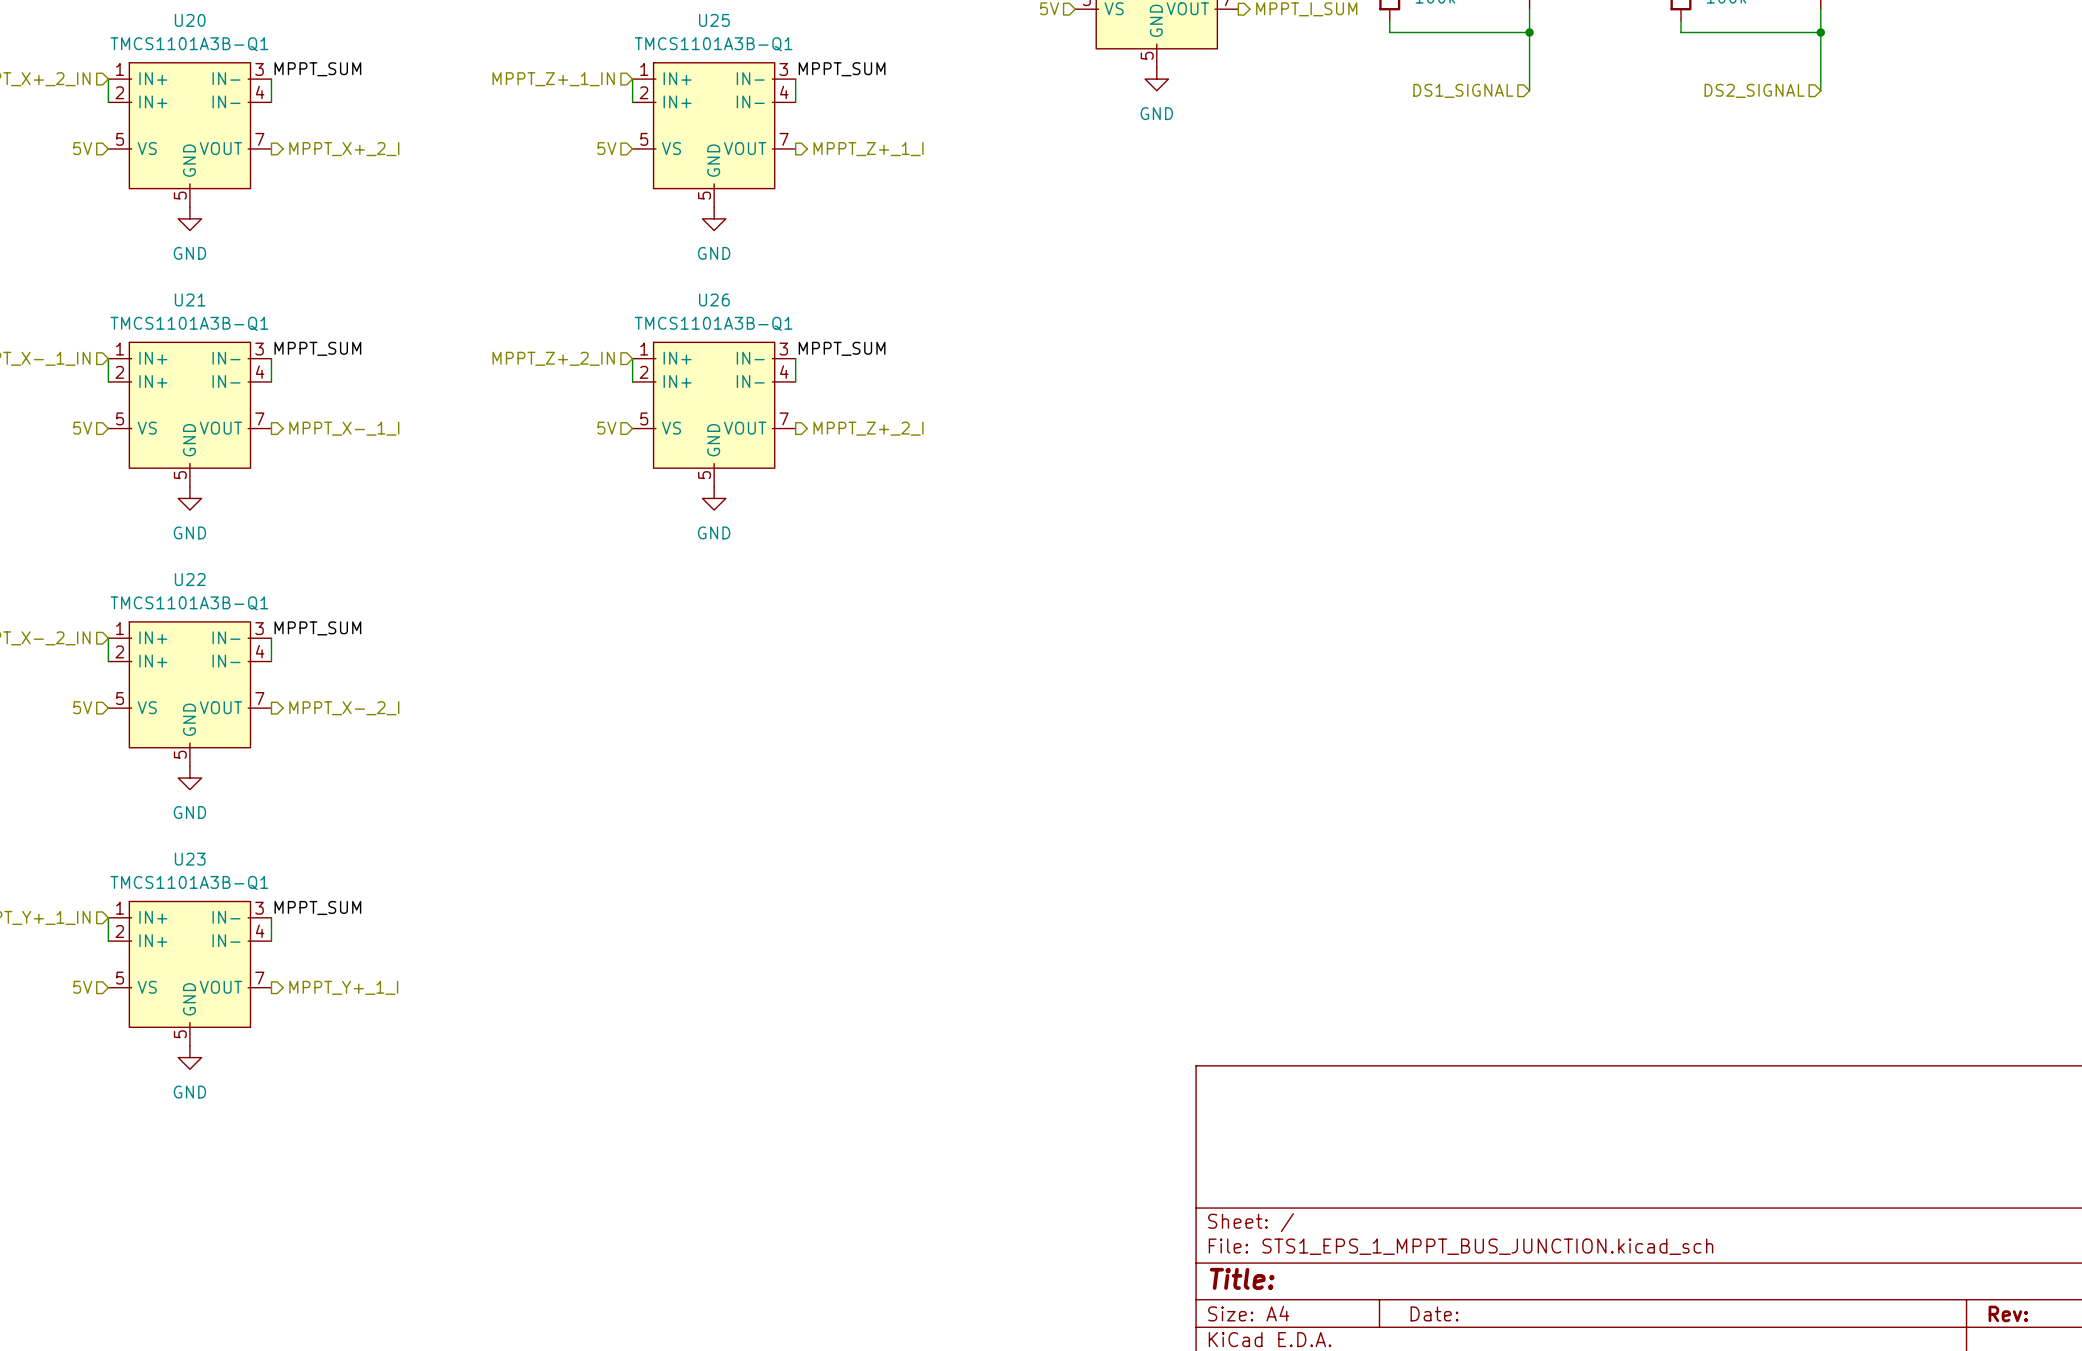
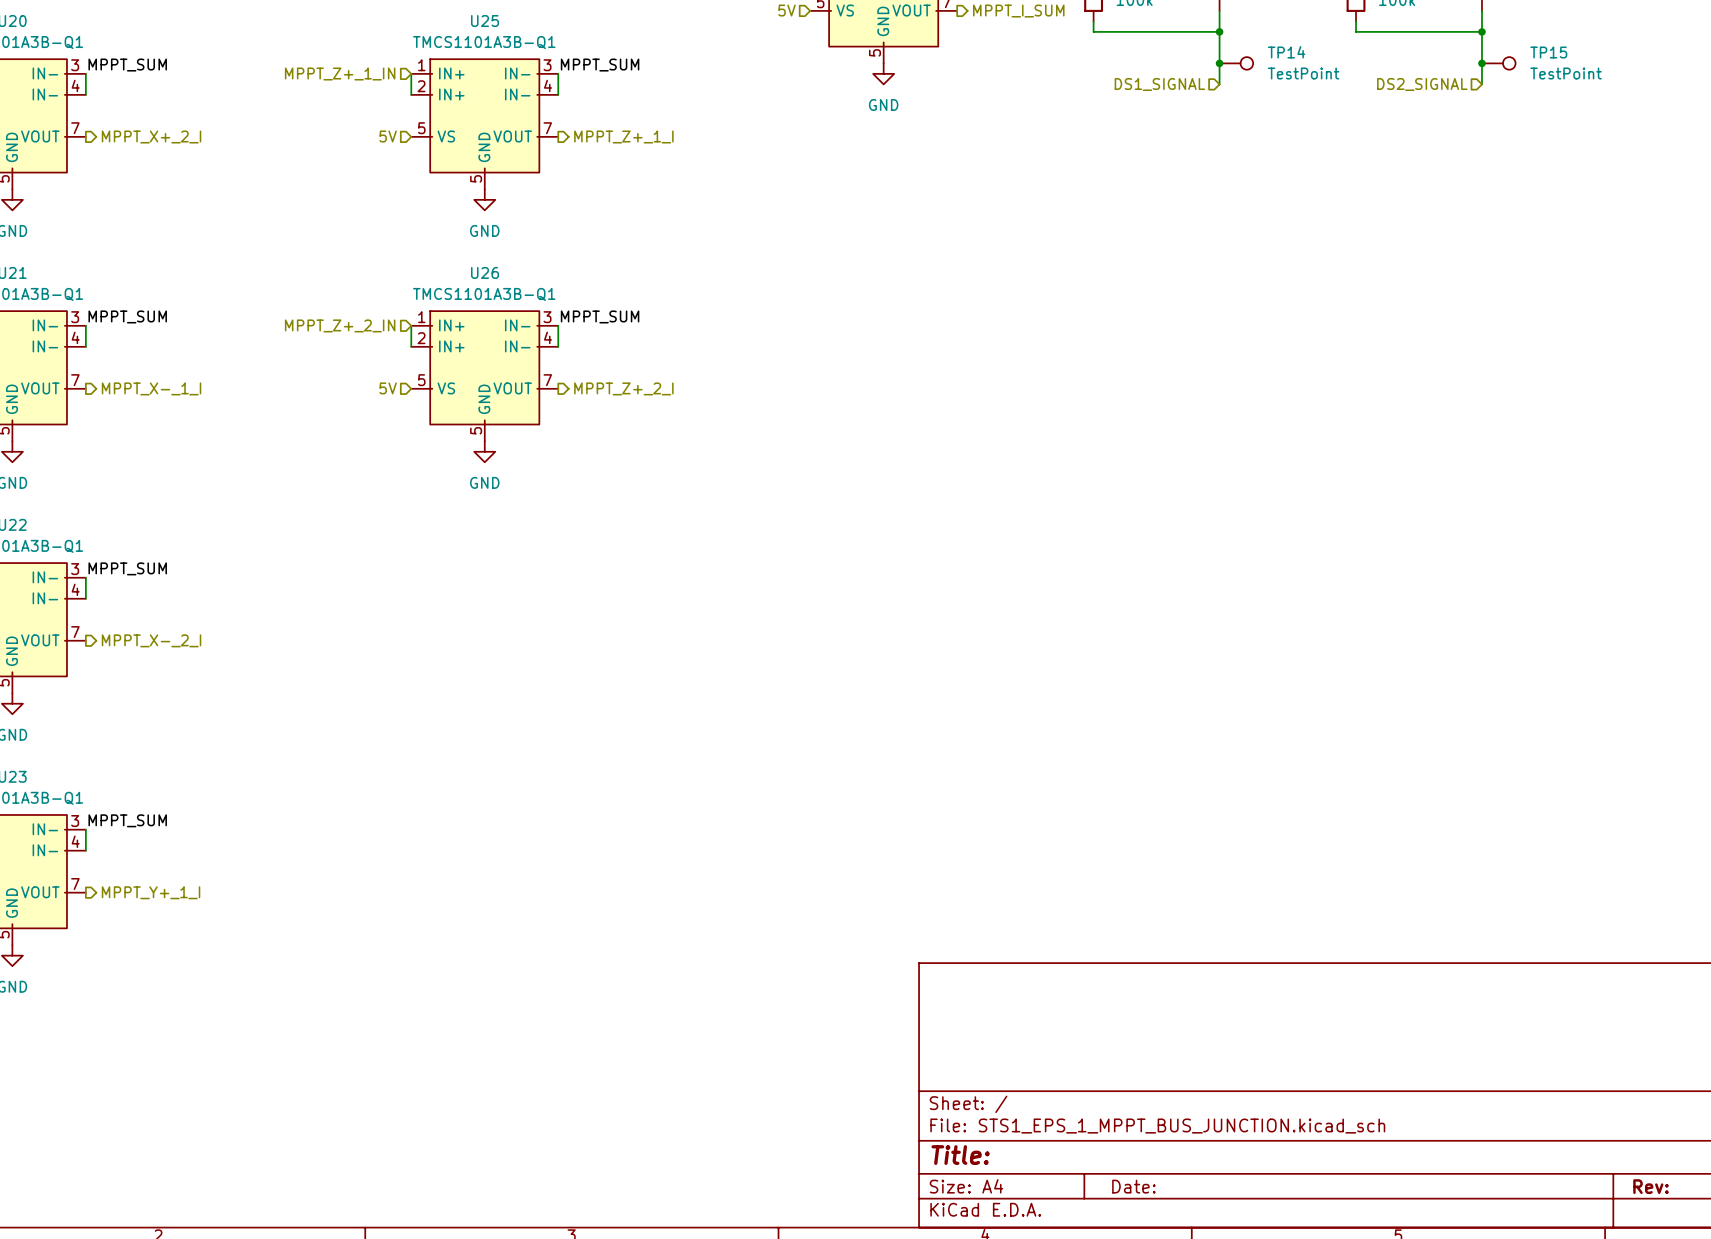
junction: none -> (1219, 63)
TP14: none -> TestPoint (1236, 63)
junction: none -> (1481, 63)
TP15: none -> TestPoint (1498, 63)

